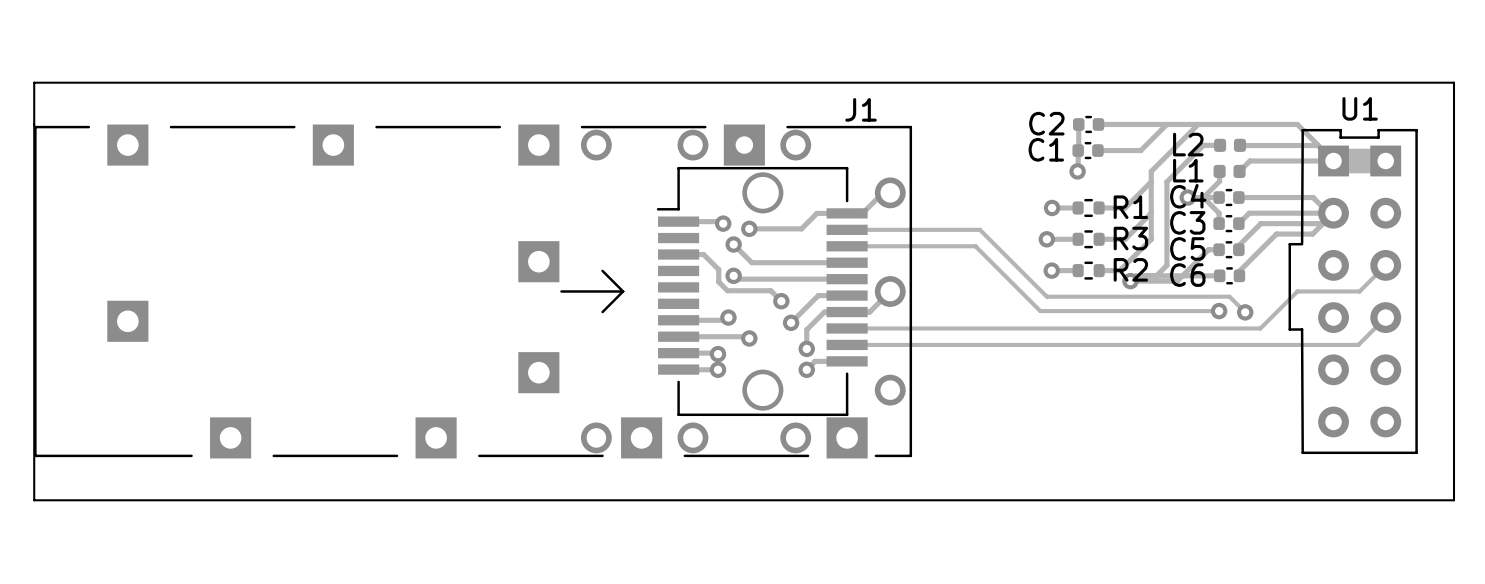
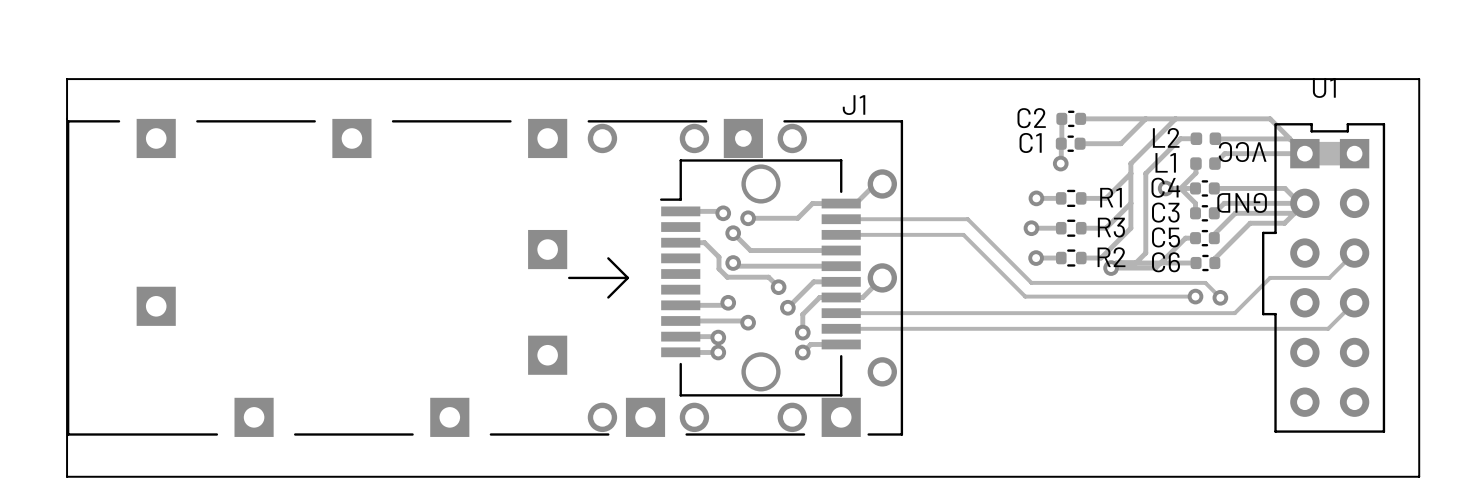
U1 footprint: [1288, 128, 1418, 455] -> [1262, 123, 1386, 433]

